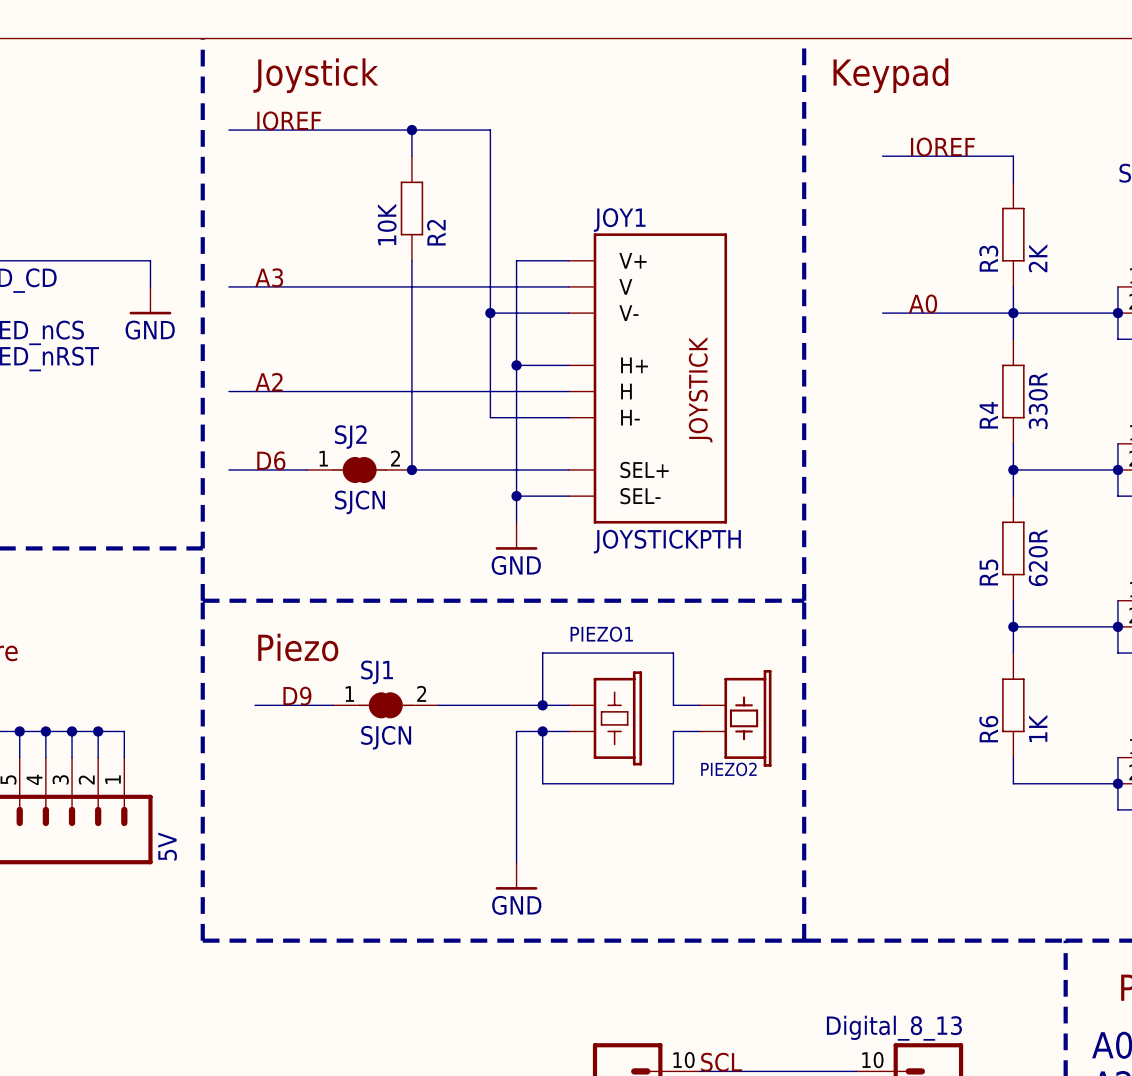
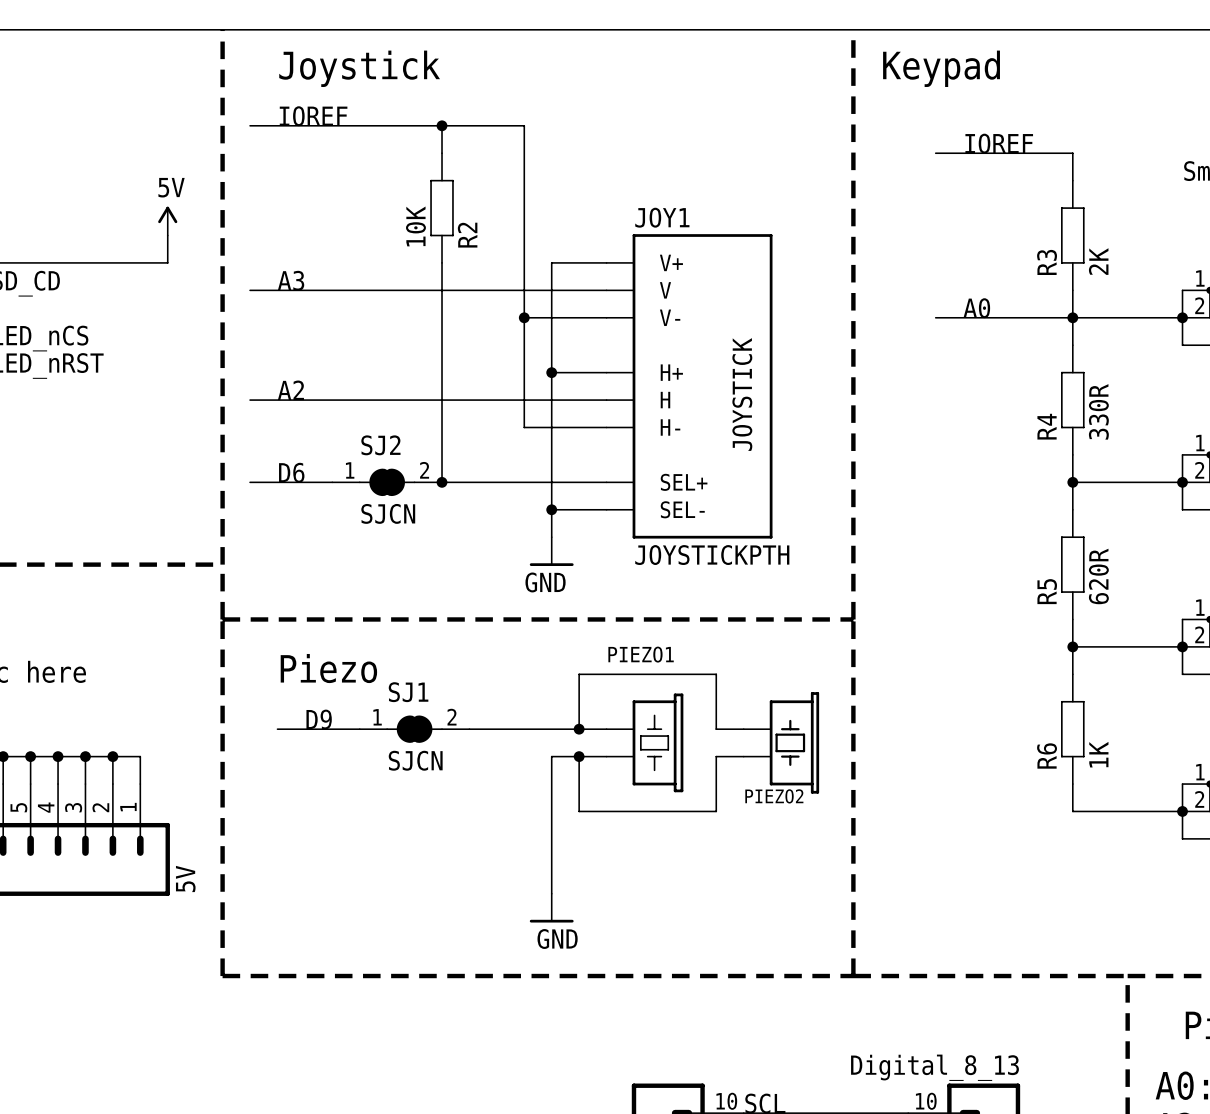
power symbol: none -> 5V (167, 221)
wire: (150, 260) (150, 286) -> (167, 262) (167, 235)
power symbol: GND (150, 300) -> none

